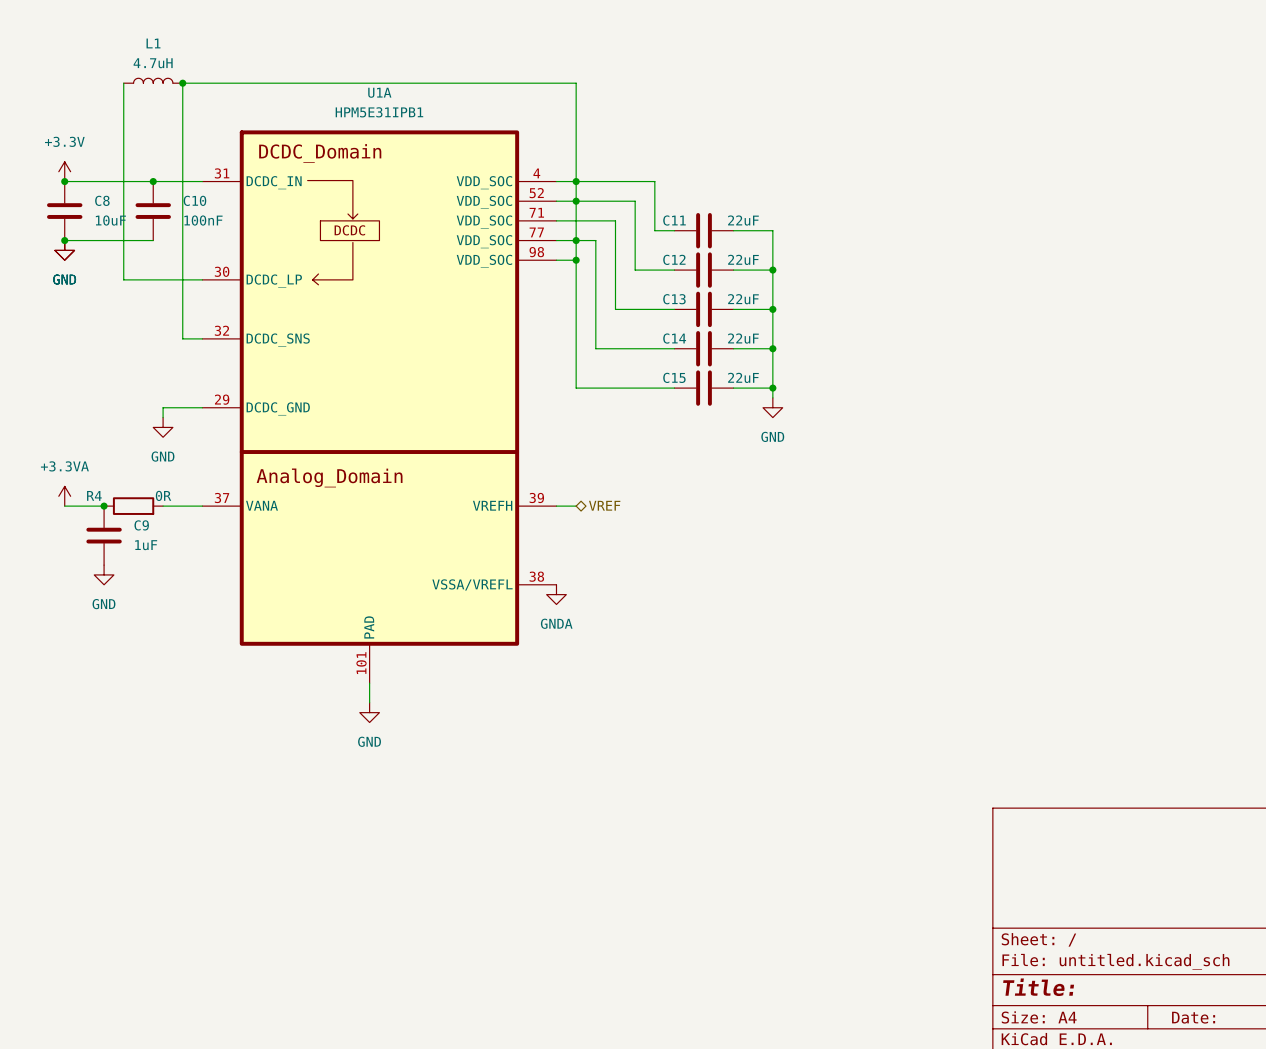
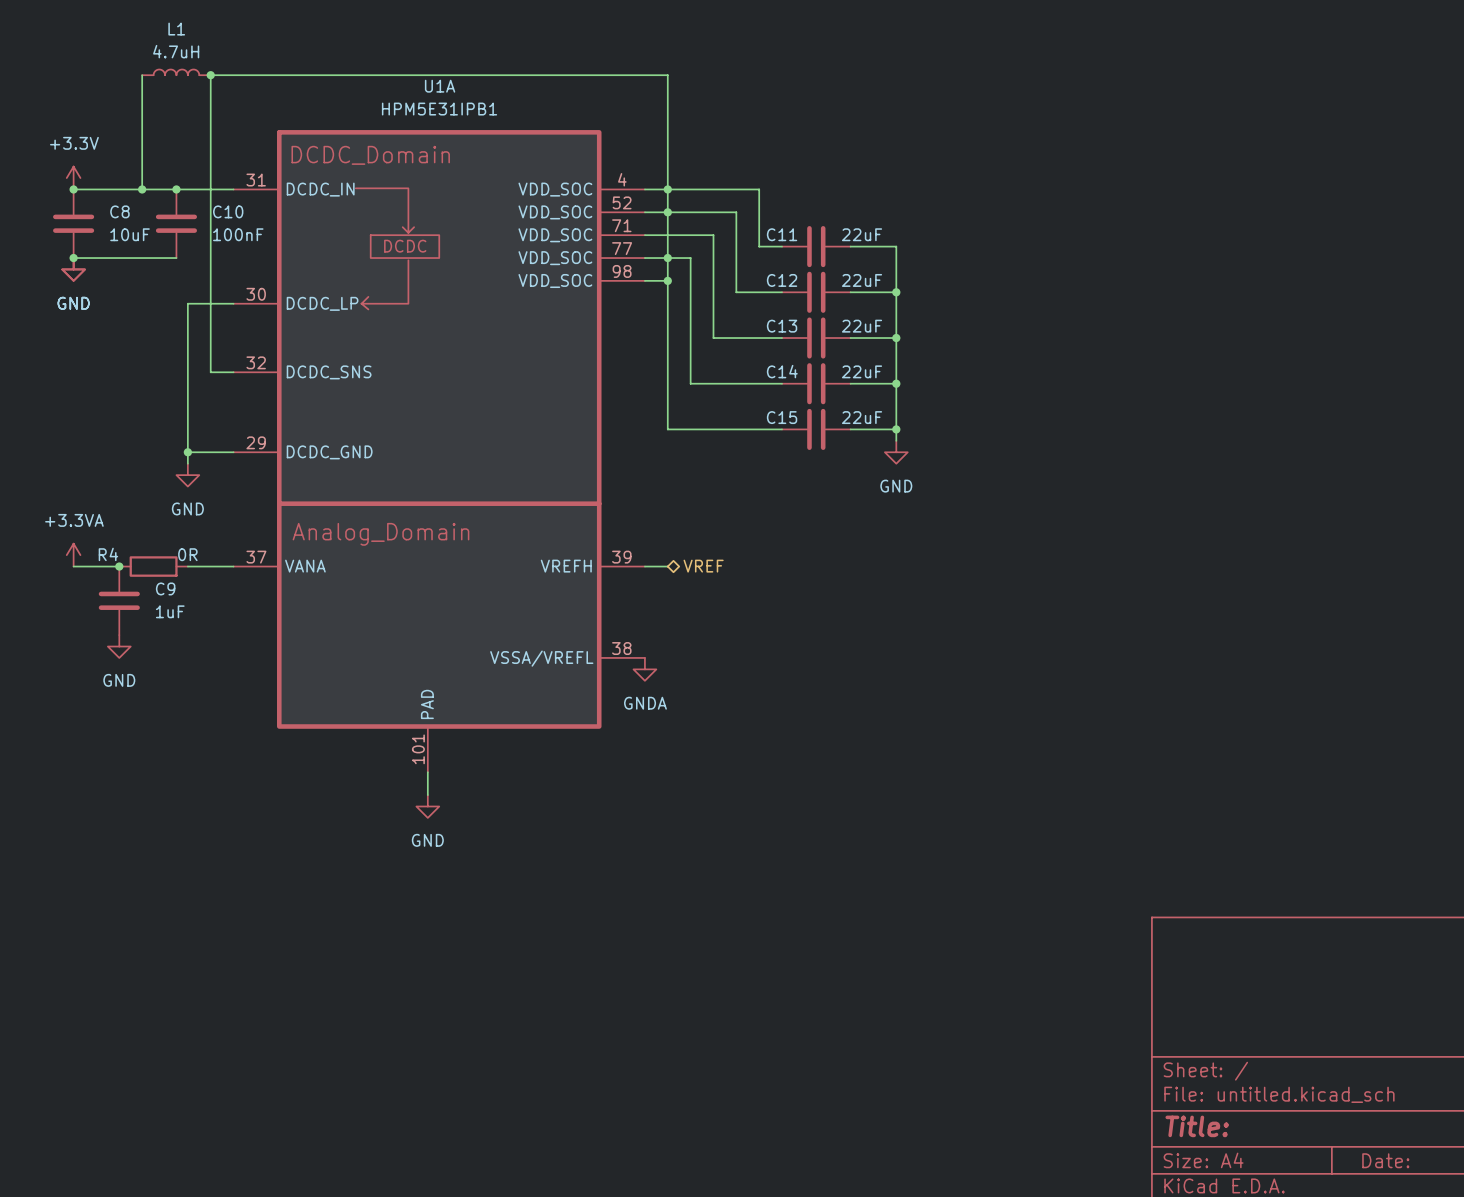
wire: (123, 181) (123, 279) (163, 279) -> (187, 452) (187, 303)
junction: none -> (142, 189)
junction: none -> (187, 452)

